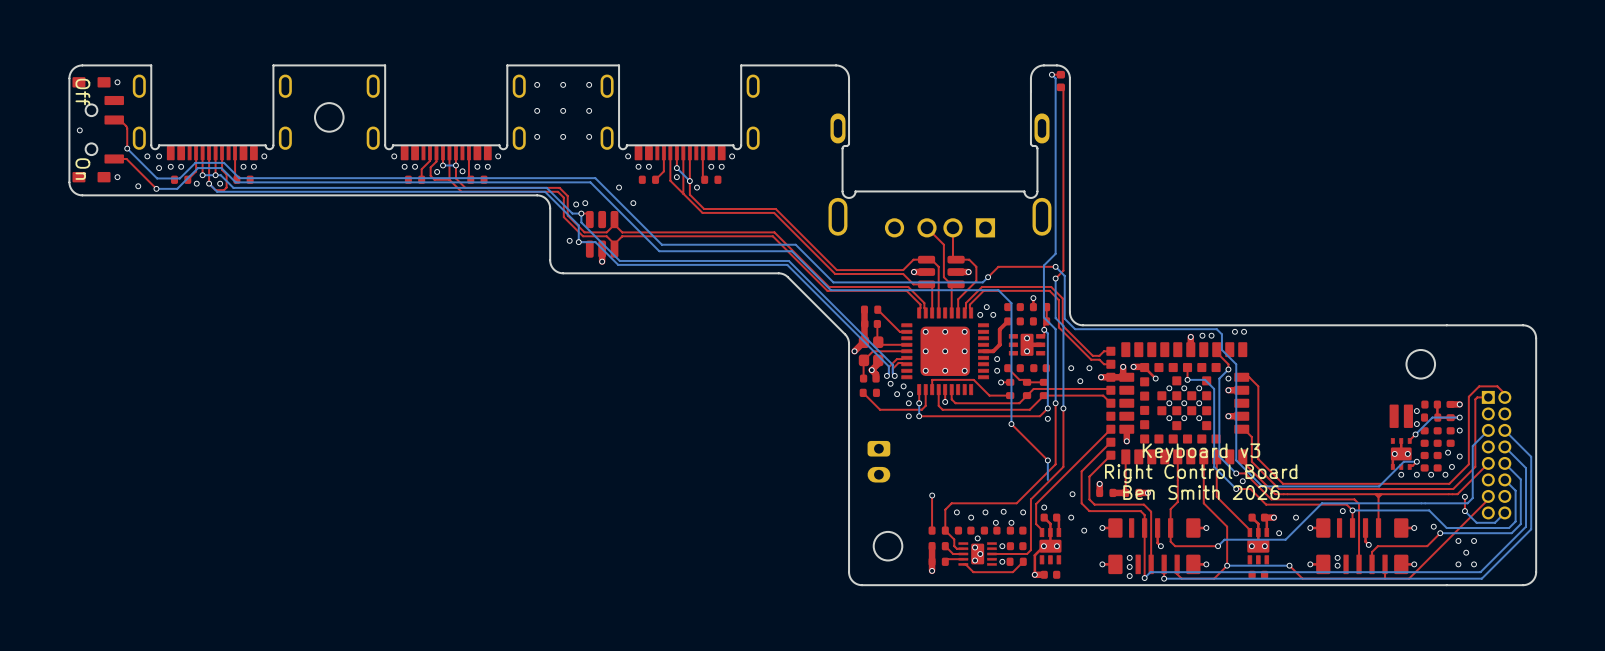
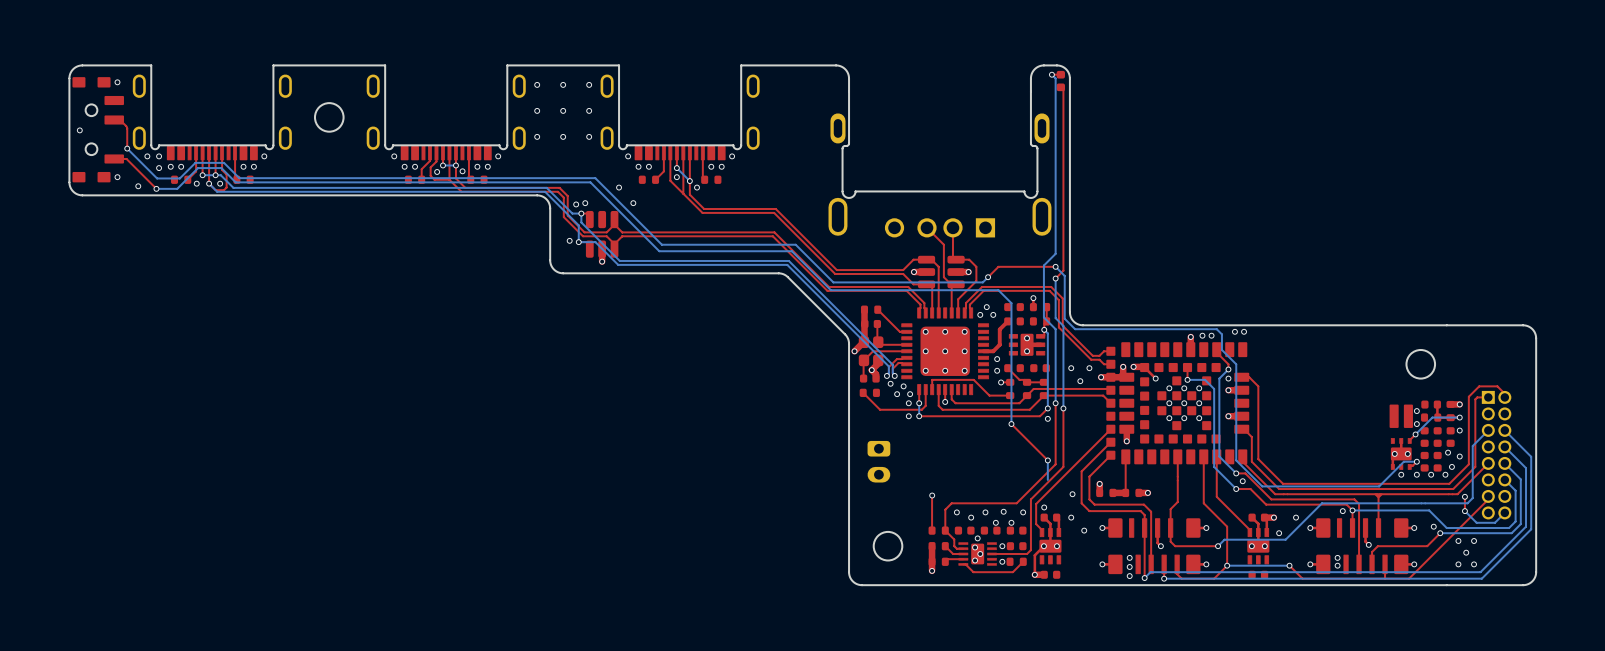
text: Off (82, 92) -> none
text: On (82, 169) -> none
text: Keyboard v3 (1201, 452) -> none
text: Right Control Board (1201, 473) -> none
text: Ben Smith 2026 (1201, 492) -> none

